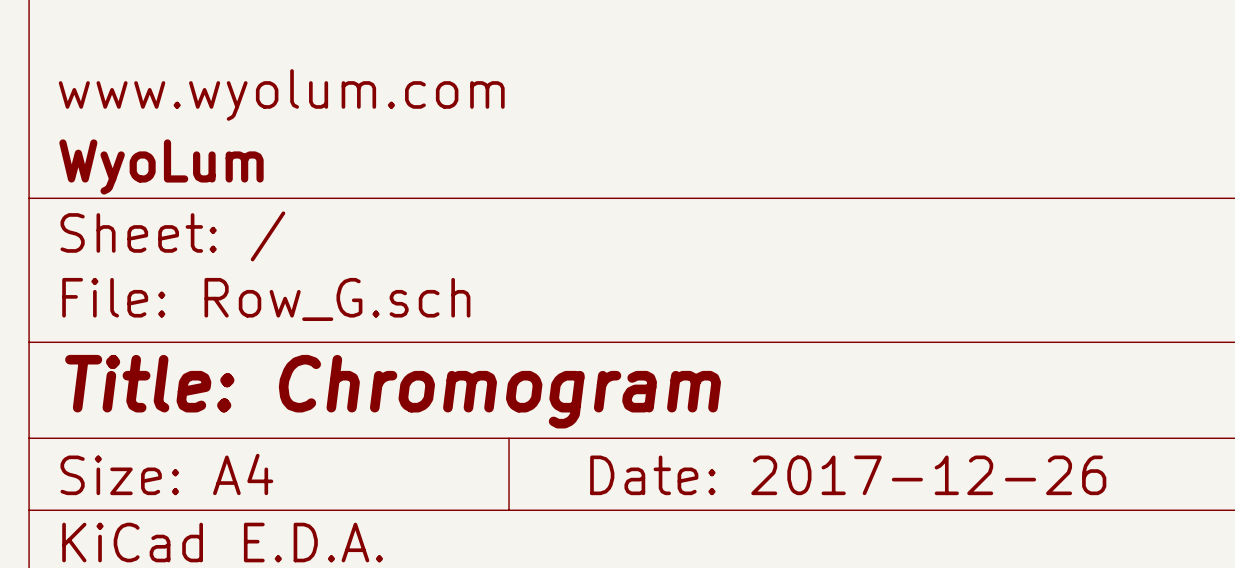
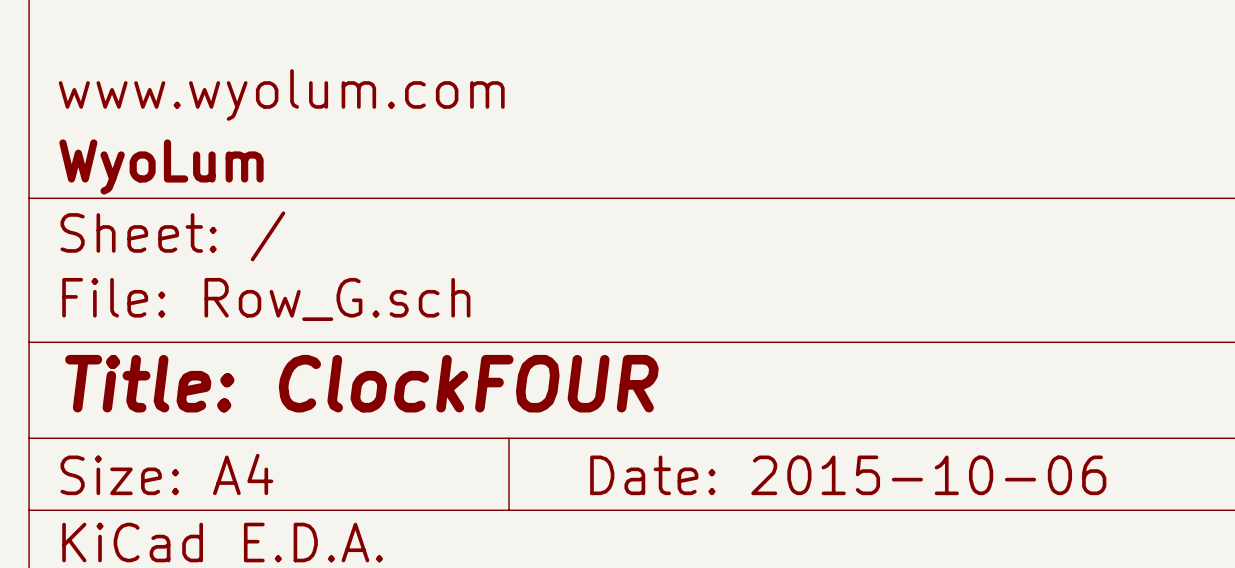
title block: Title: Chromogram (393, 391) -> Title: ClockFOUR (361, 383)
title block: Date: 2017-12-26 (848, 475) -> Date: 2015-10-06 (848, 475)

